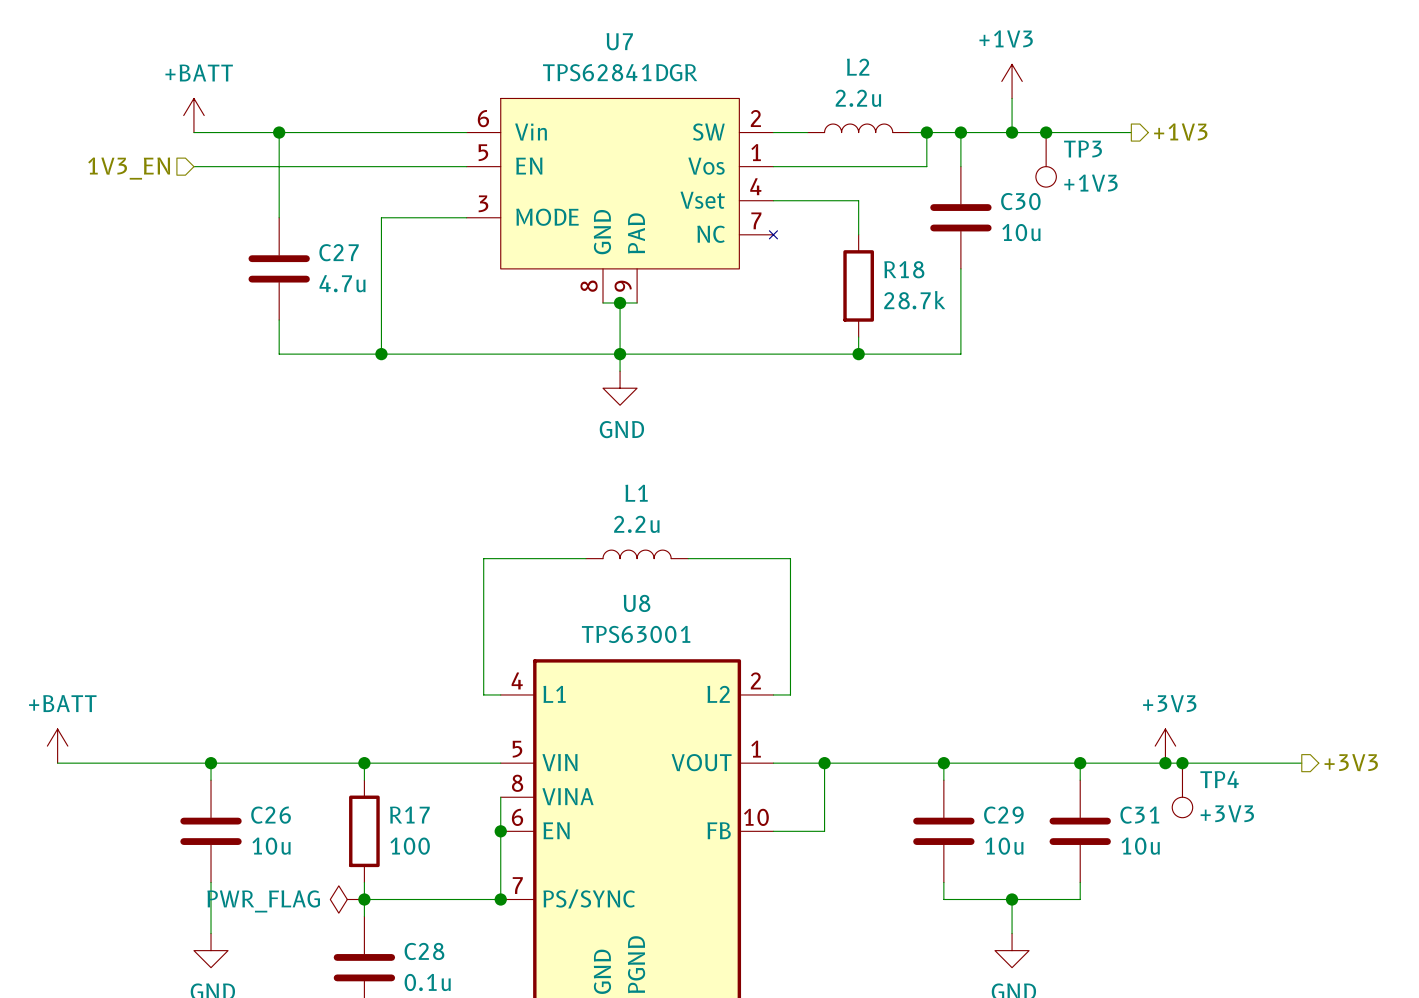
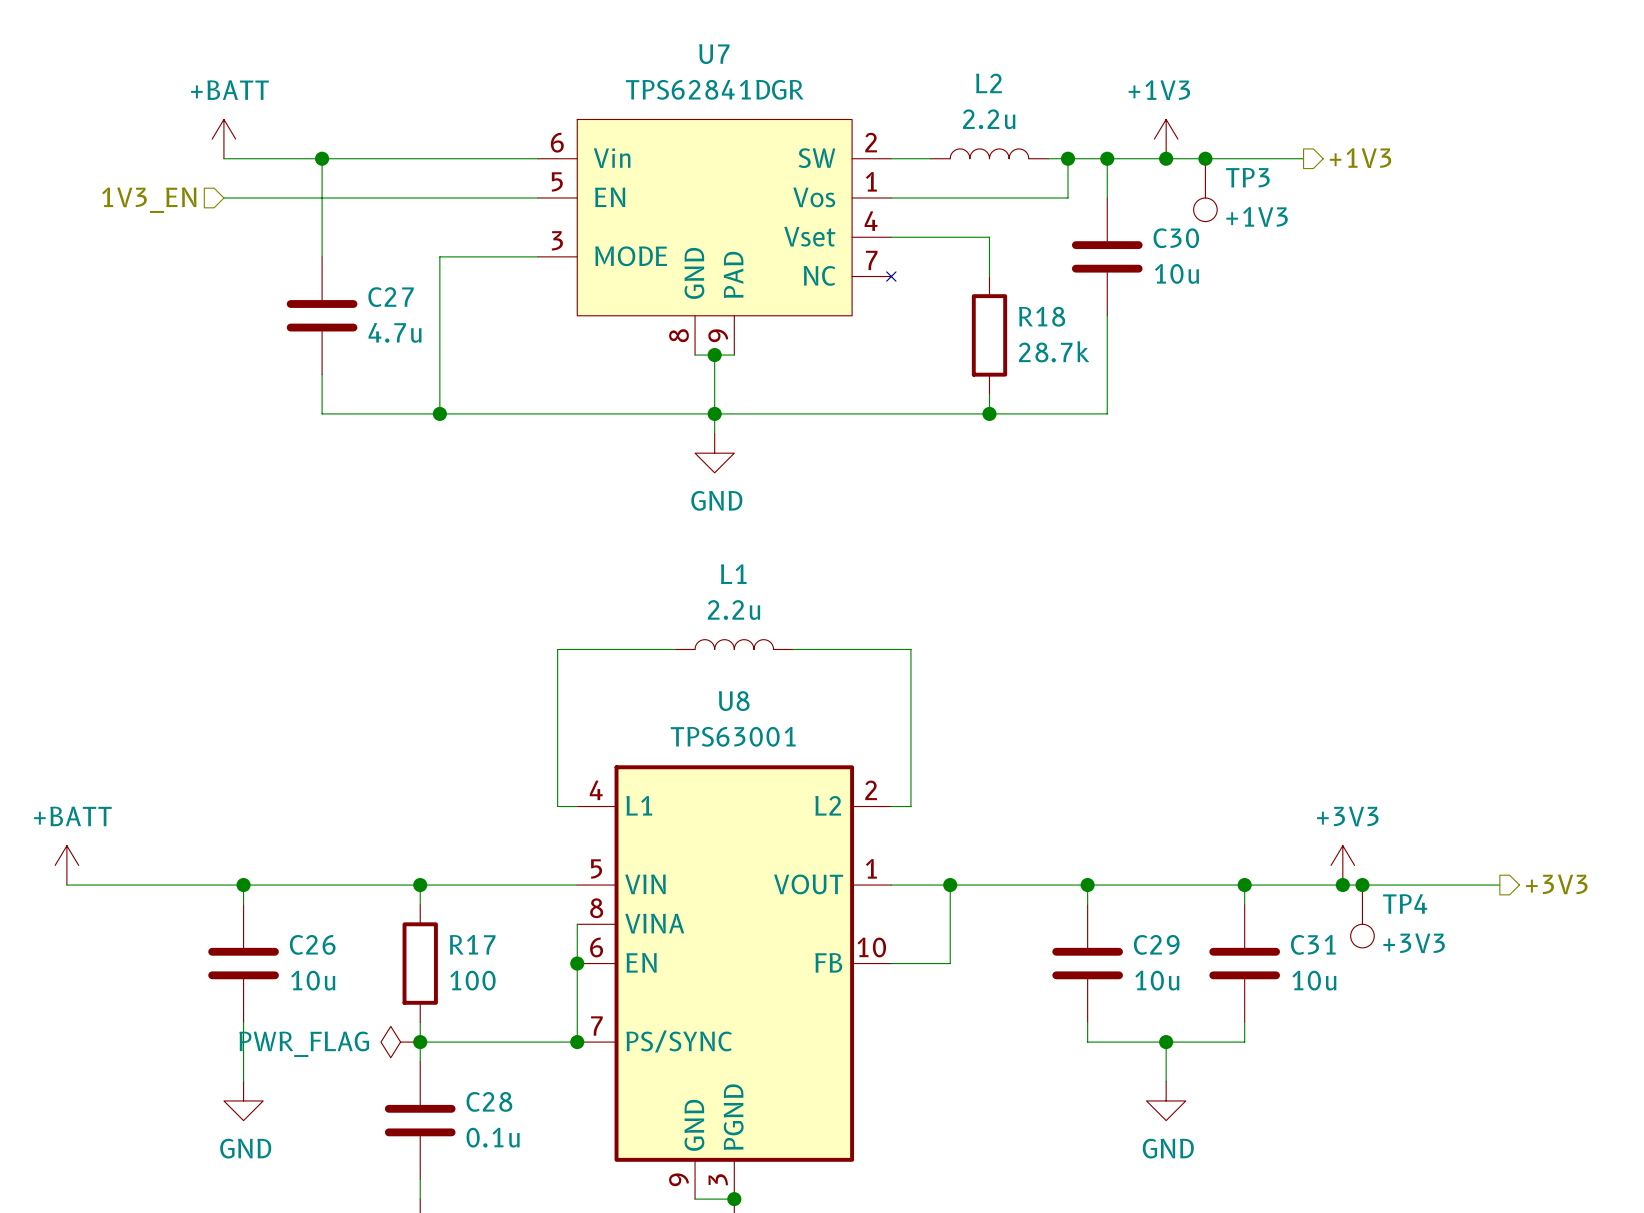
power symbol position: +1V3 (1012, 81) -> +1V3 (1166, 139)

